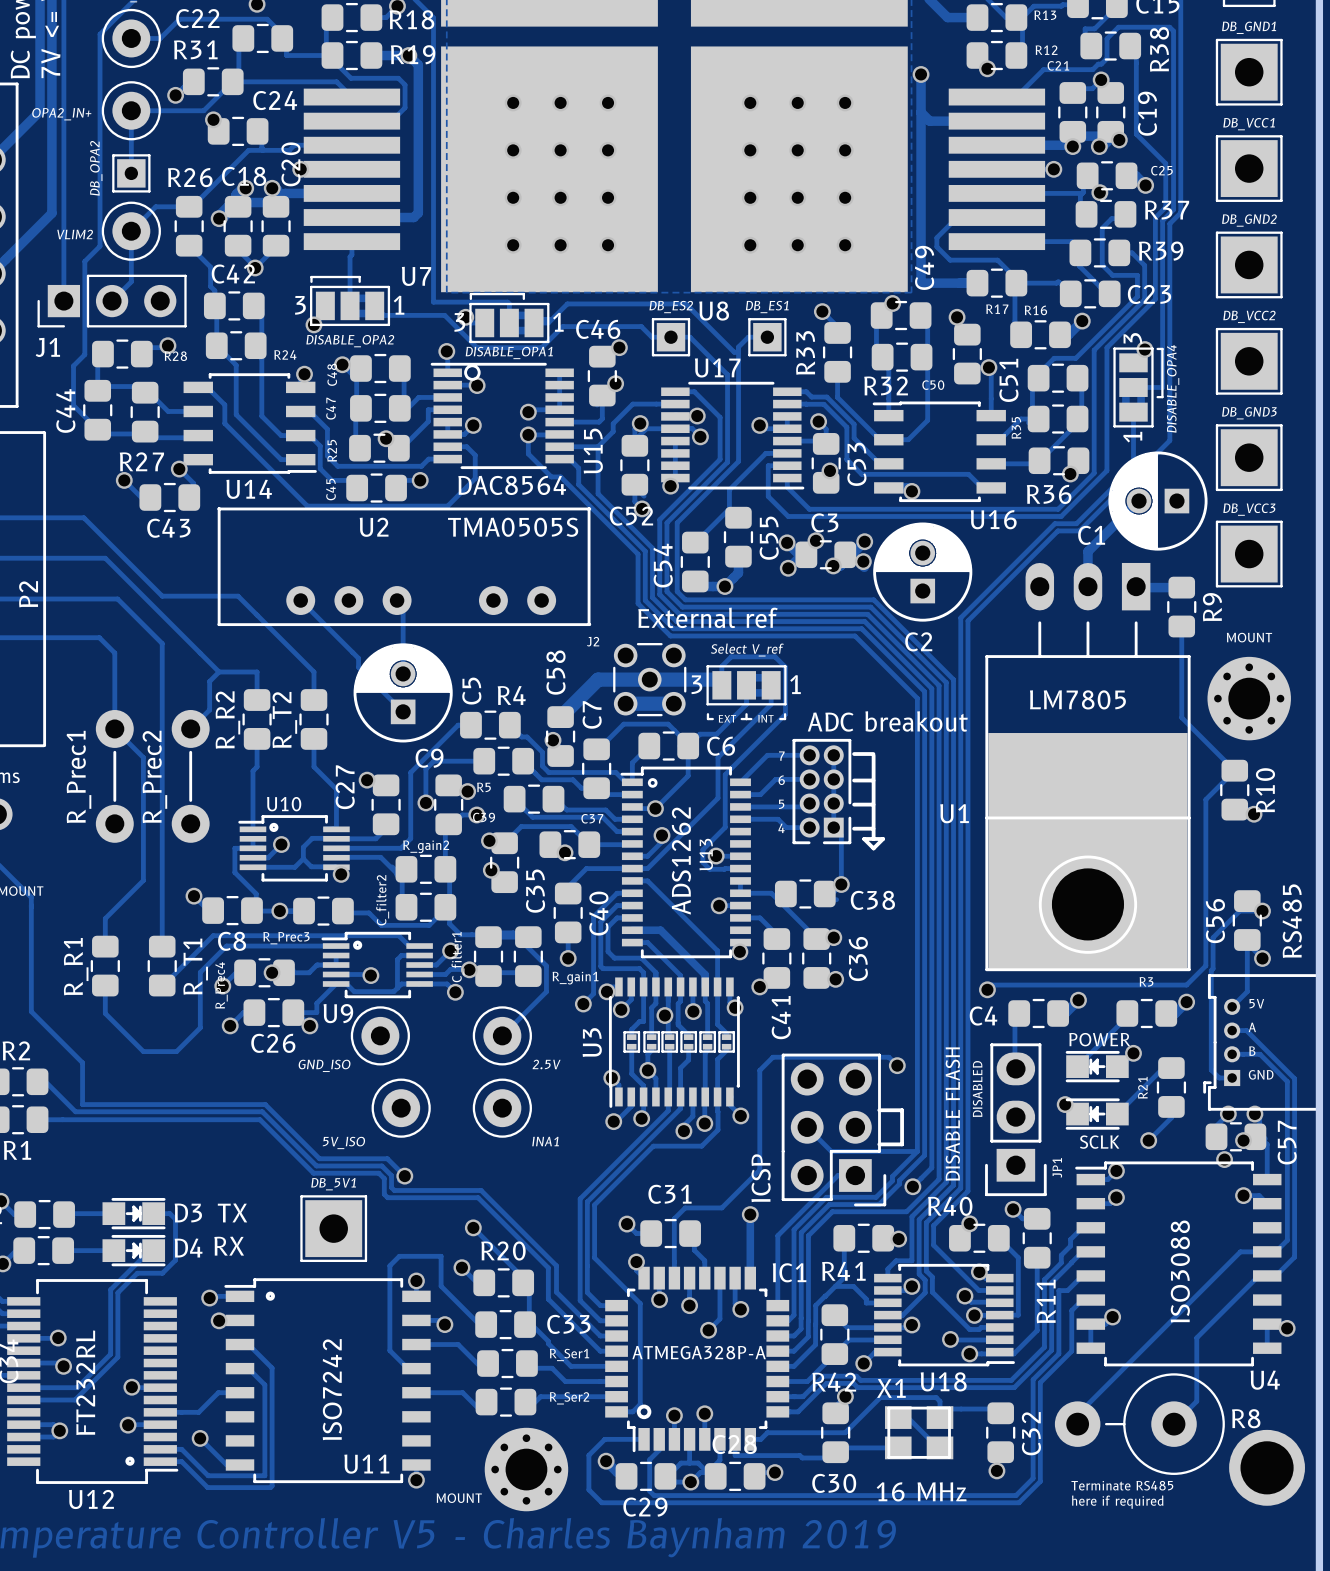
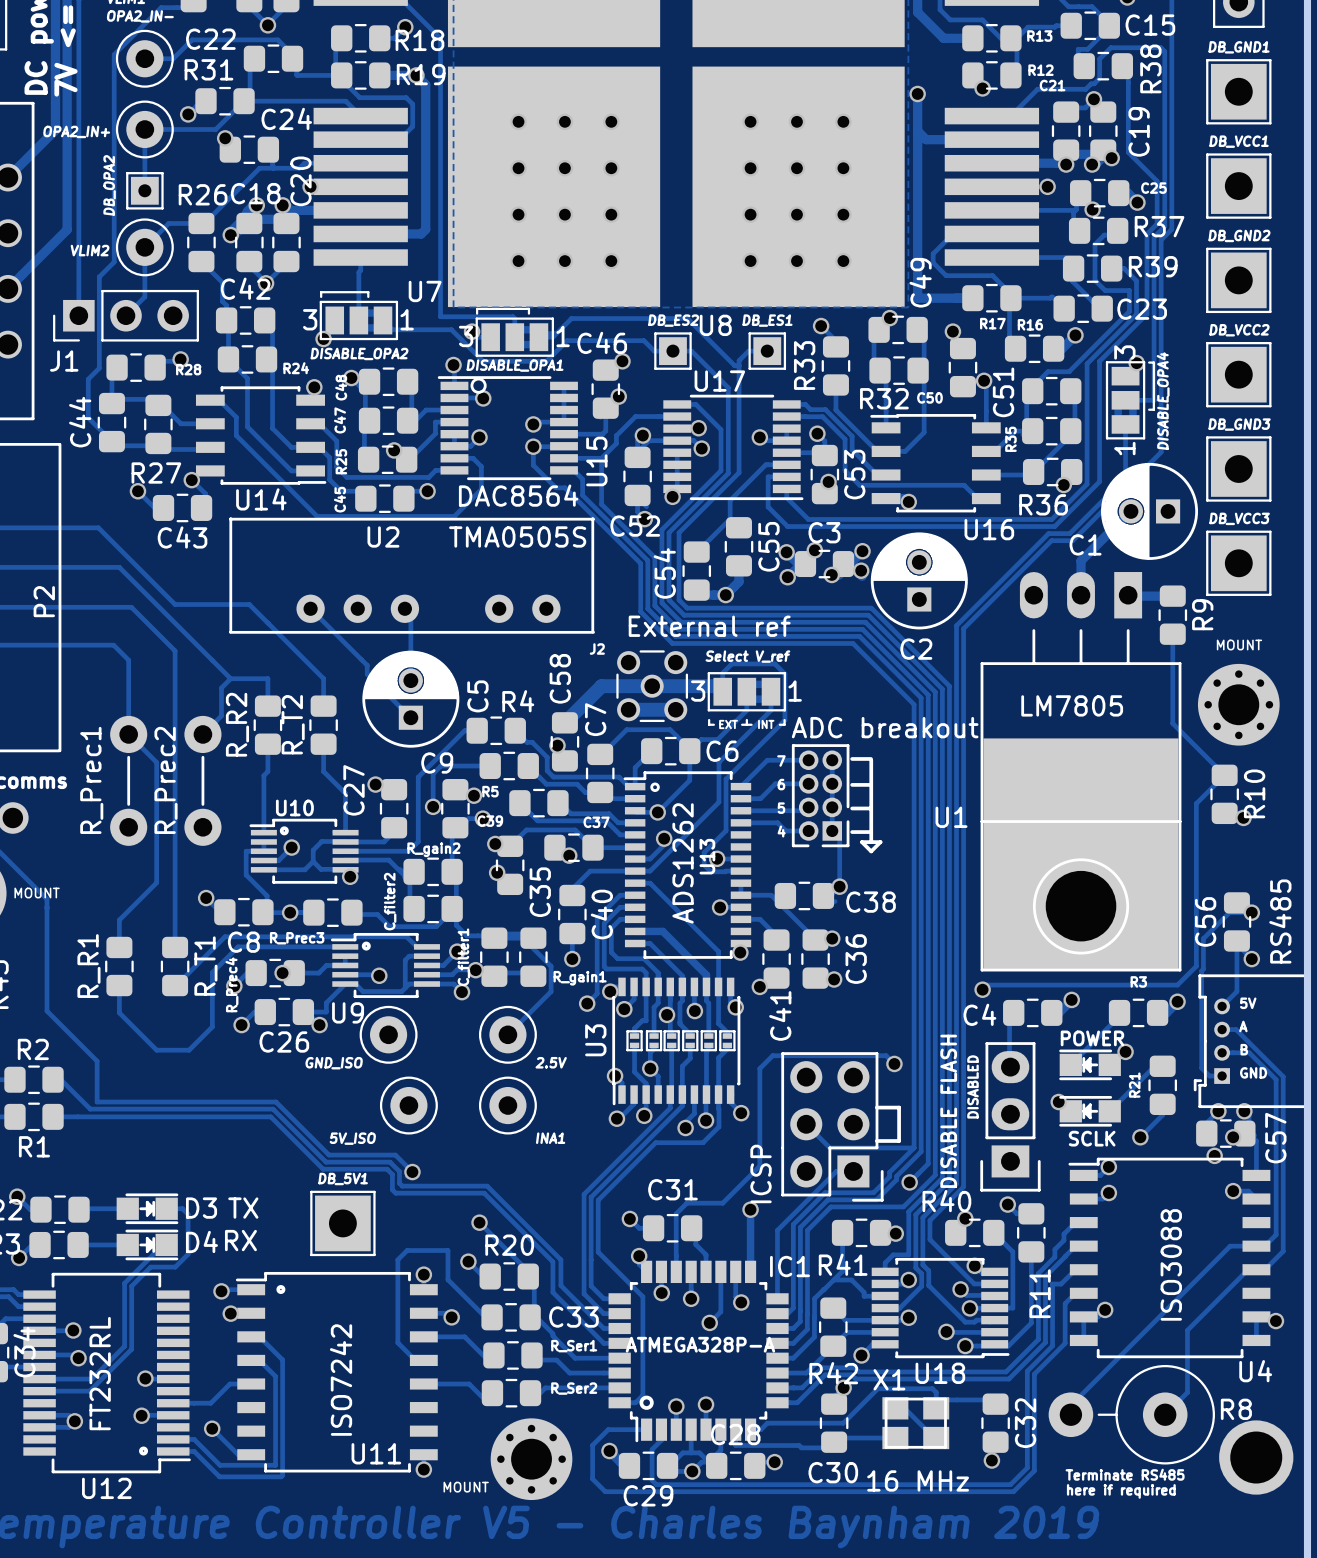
JP1 name: JP1 (1057, 1167) -> none

